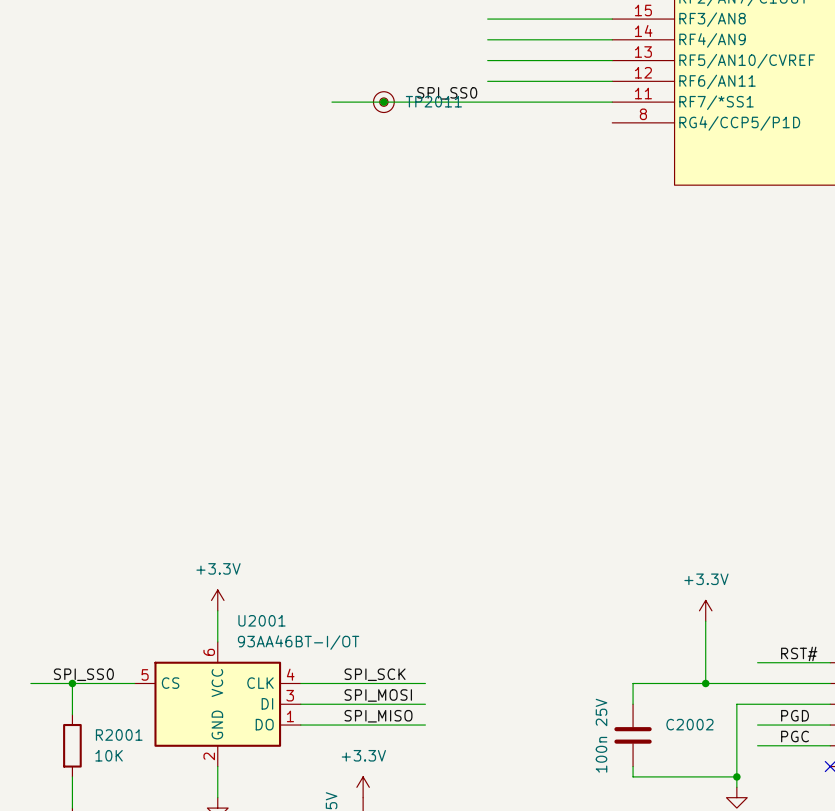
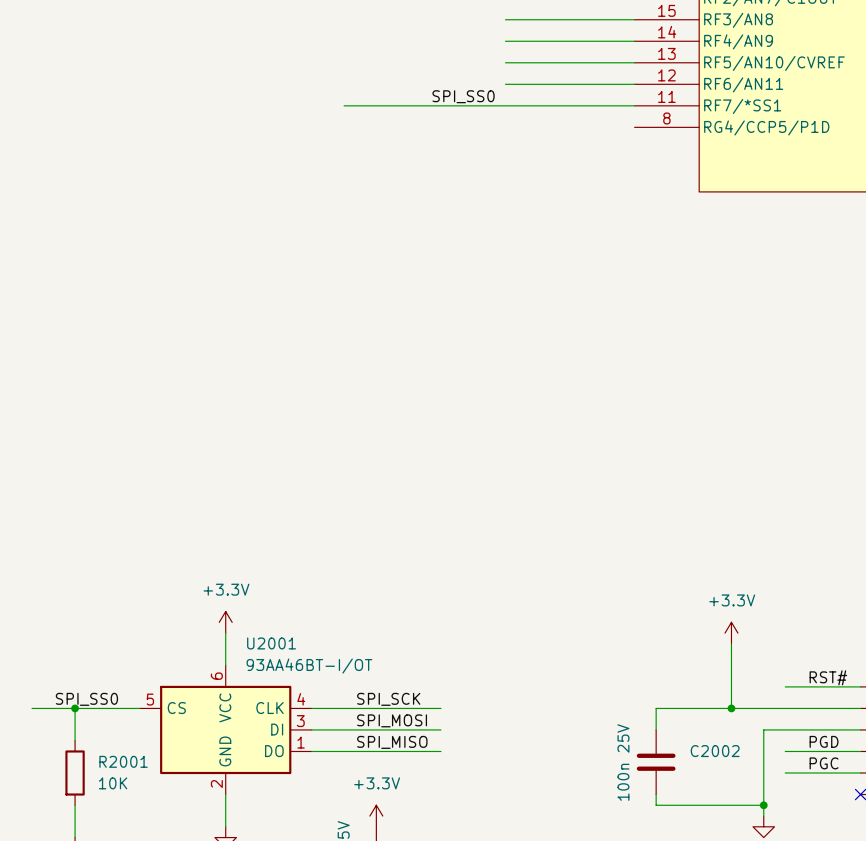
junction: (383, 102) -> none
TP2011: (383, 102) -> none

